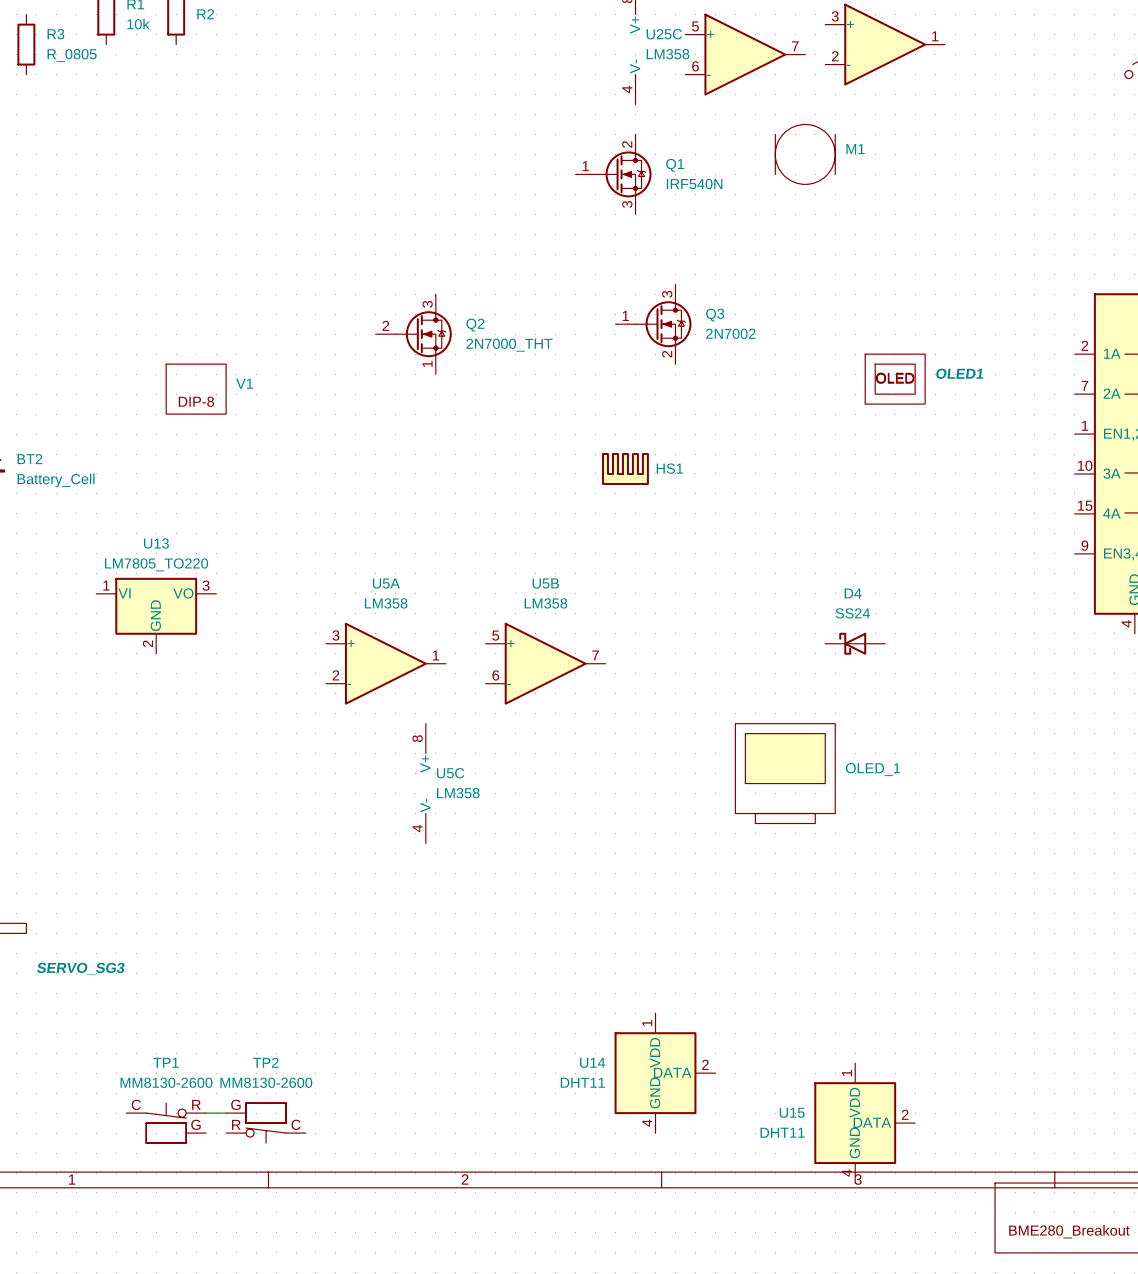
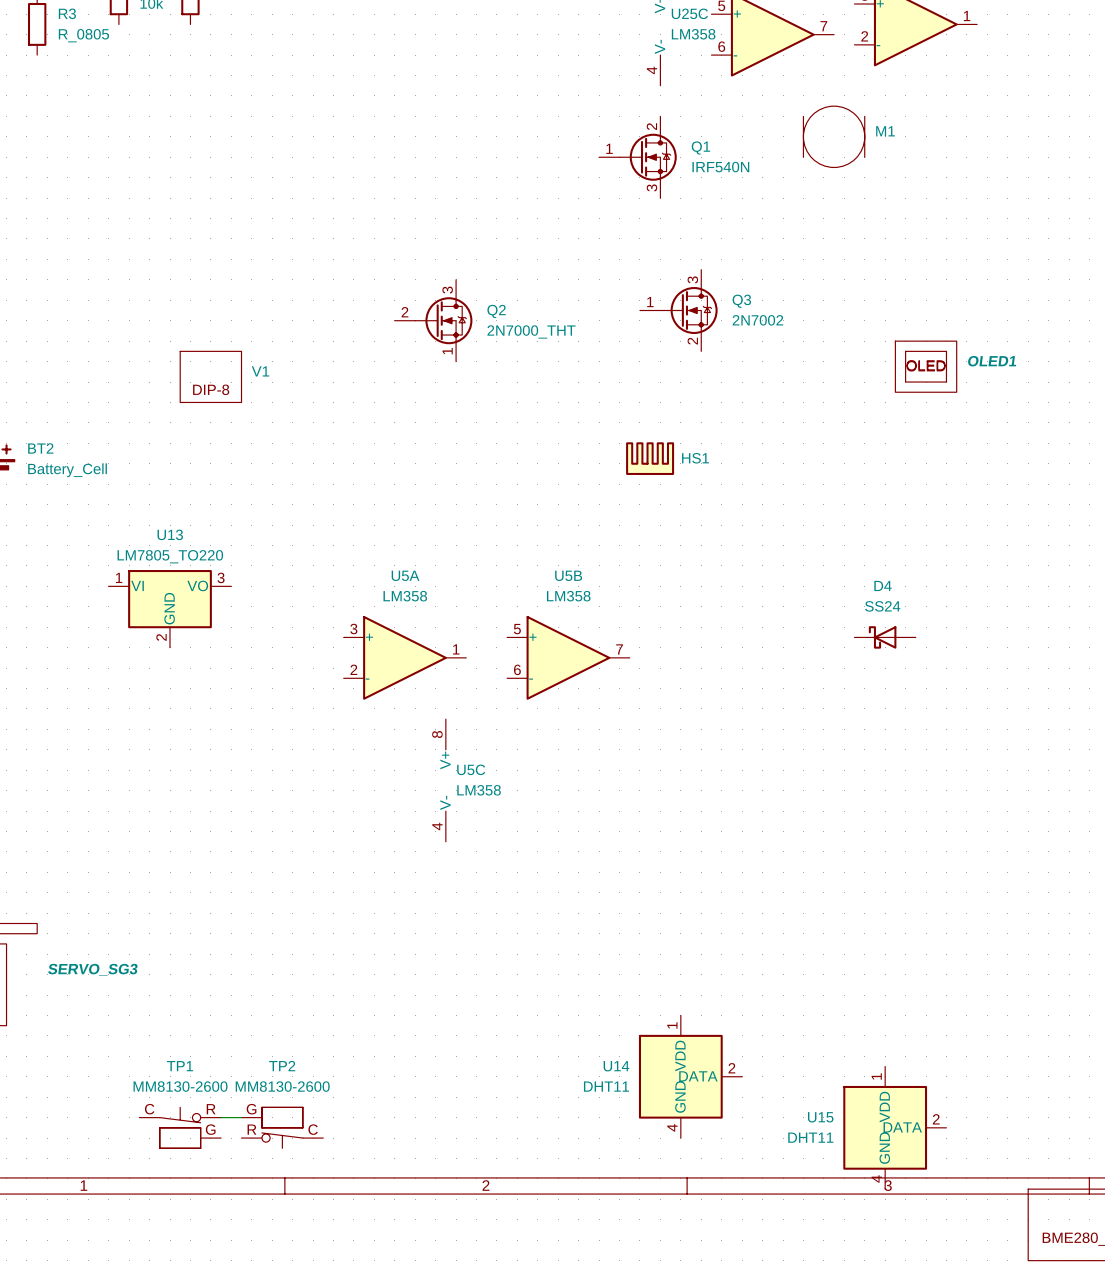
OLED_1: (785, 773) -> none

